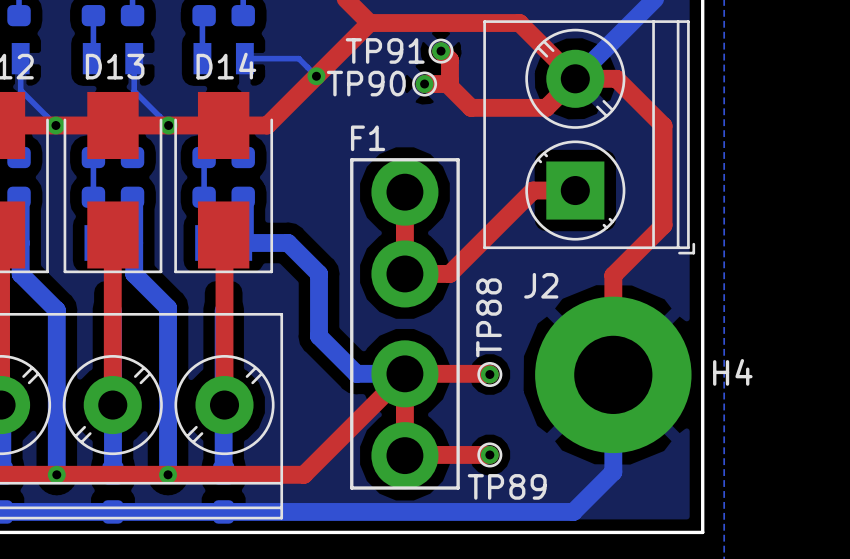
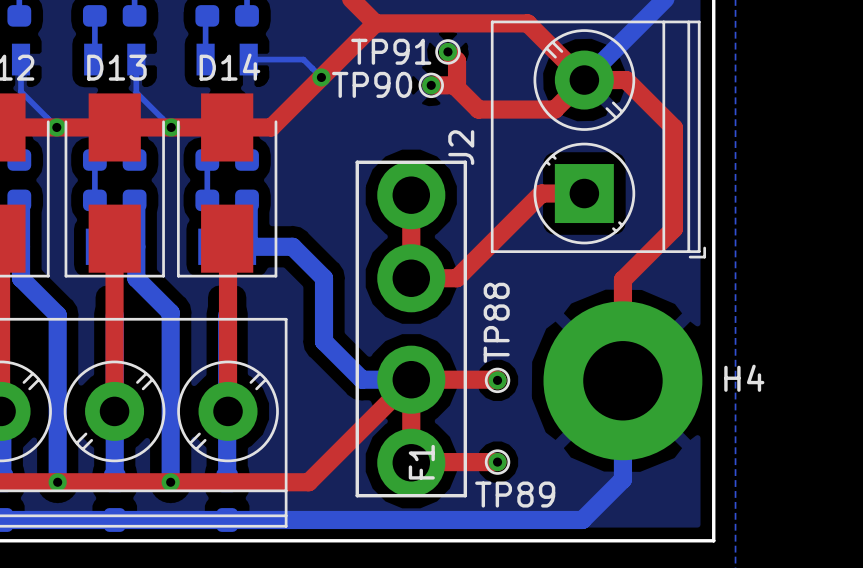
F1 name rotation: 0° (368, 138) -> 90° counterclockwise (421, 462)
F1 name position: F1 (368, 138) -> F1 (421, 462)
J2 name rotation: 0° (541, 285) -> 90° counterclockwise (461, 147)
J2 name position: J2 (541, 285) -> J2 (461, 147)

